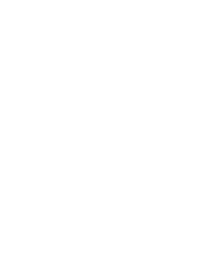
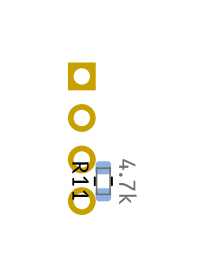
part: none -> (81, 138)
R11: none -> 4.7k (103, 181)

